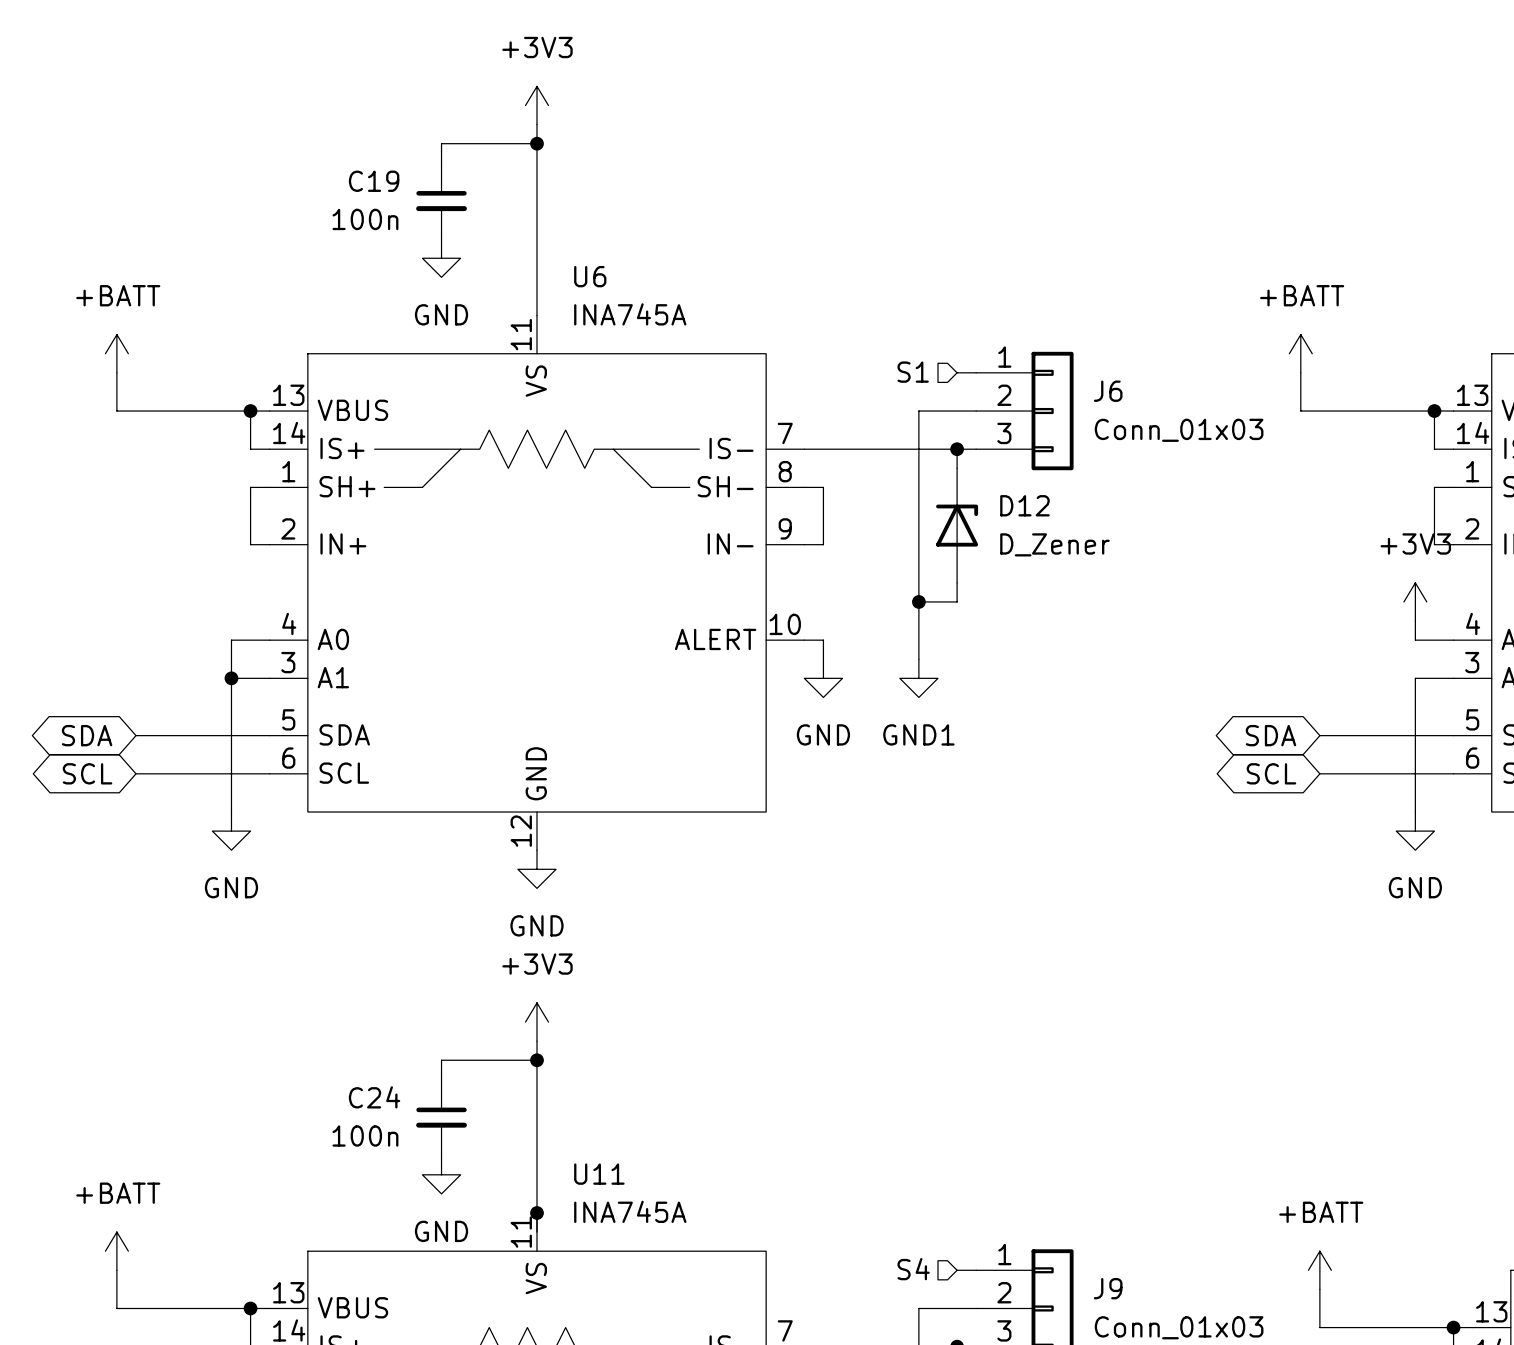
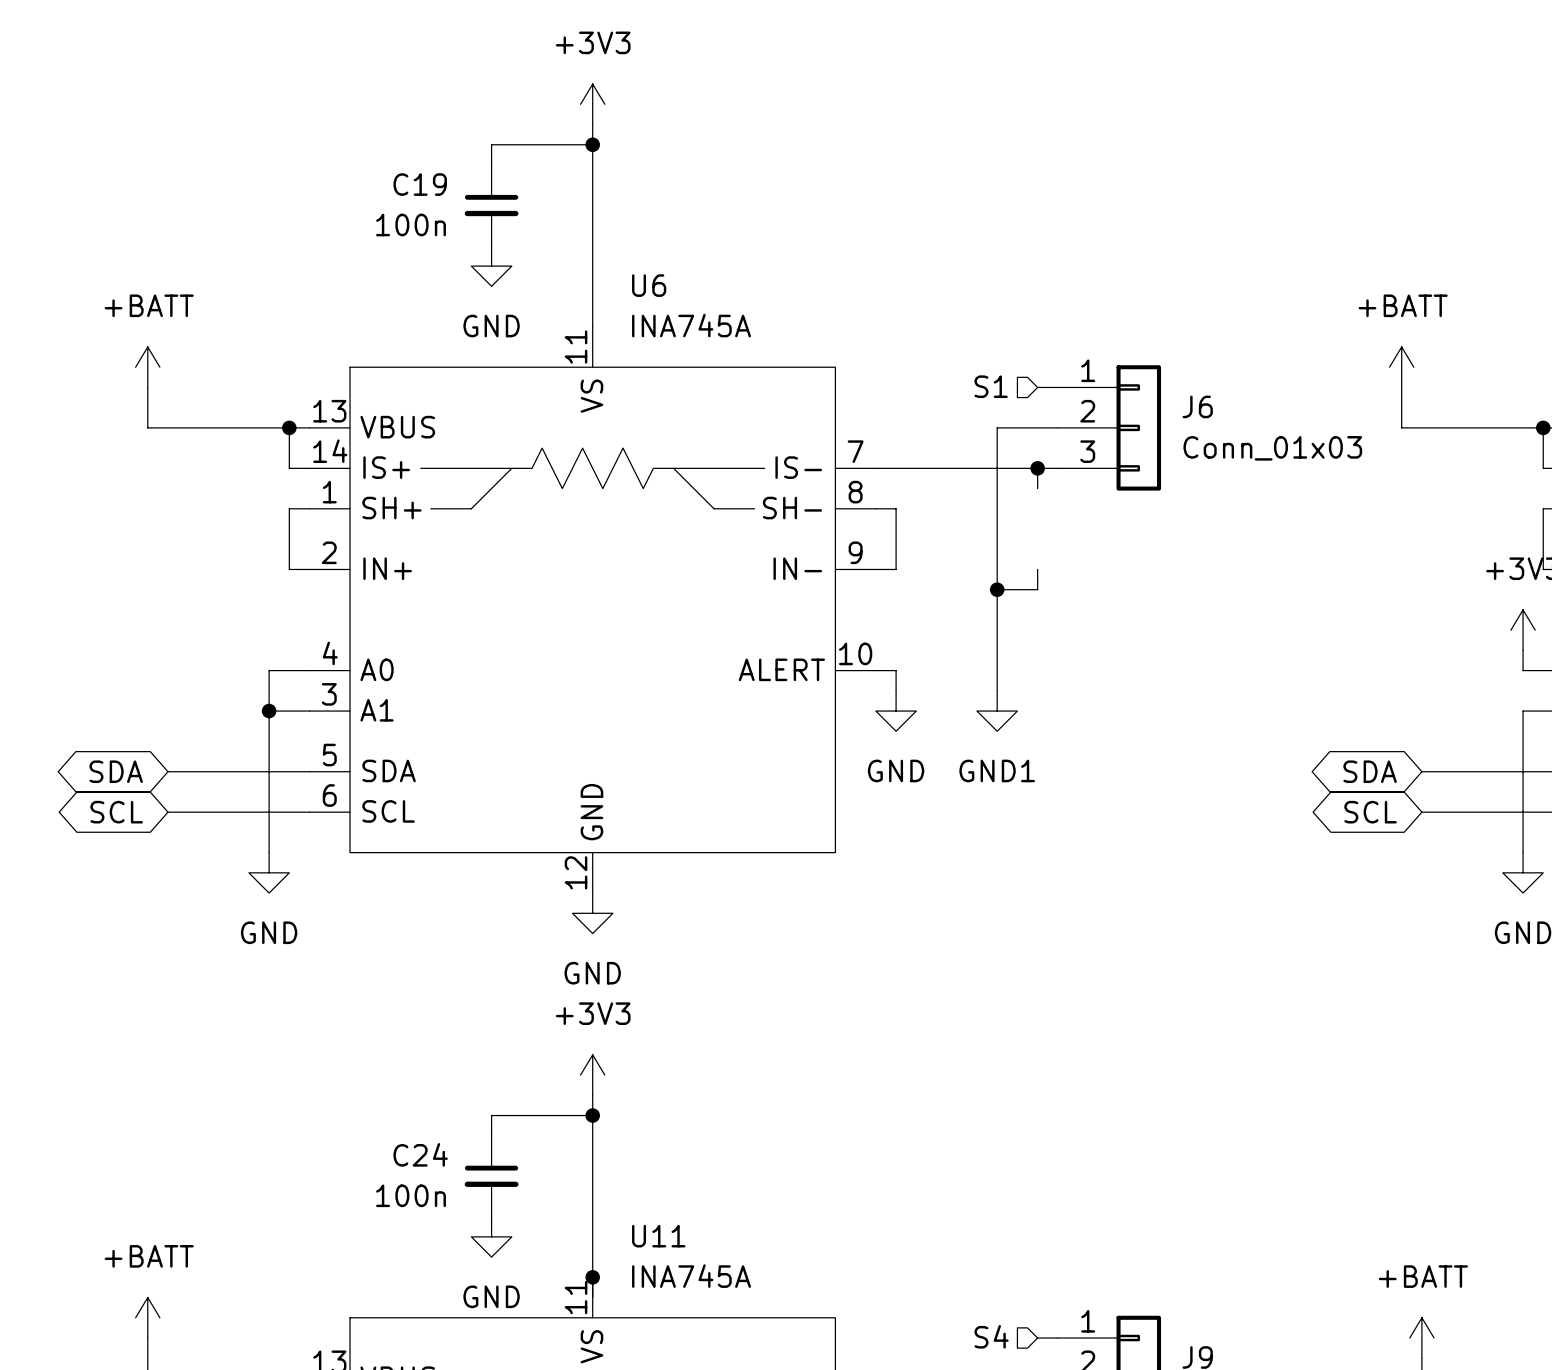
D12: D_Zener (957, 525) -> none
wire: (957, 582) (957, 601) (918, 601) -> (1037, 569) (1037, 589) (997, 589)
junction position: (918, 601) -> (997, 589)

